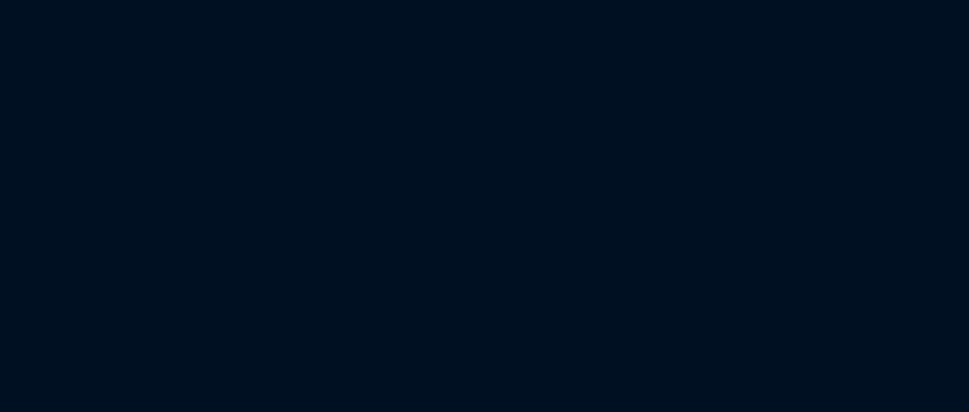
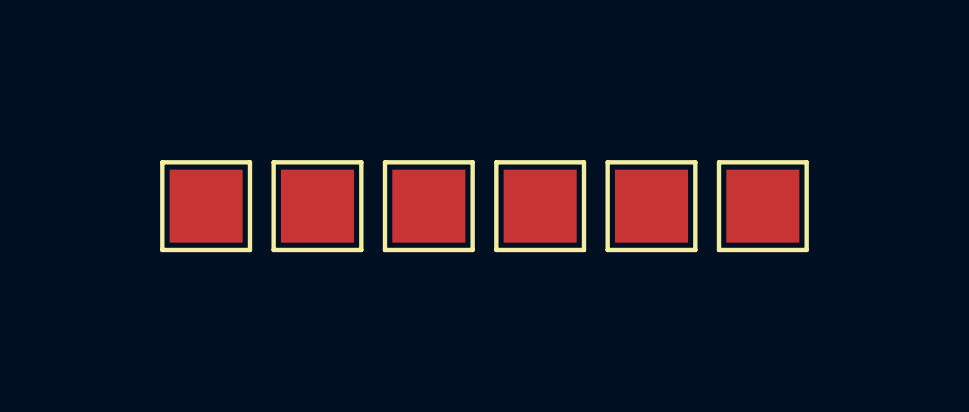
part: none -> (206, 206)
part: none -> (317, 206)
part: none -> (428, 206)
part: none -> (540, 206)
part: none -> (651, 206)
part: none -> (762, 206)

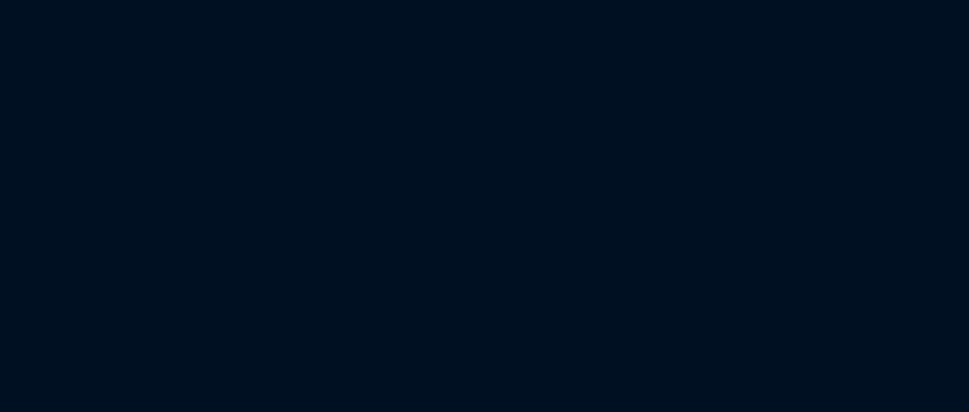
part: (206, 206) -> none
part: (317, 206) -> none
part: (428, 206) -> none
part: (540, 206) -> none
part: (651, 206) -> none
part: (762, 206) -> none

